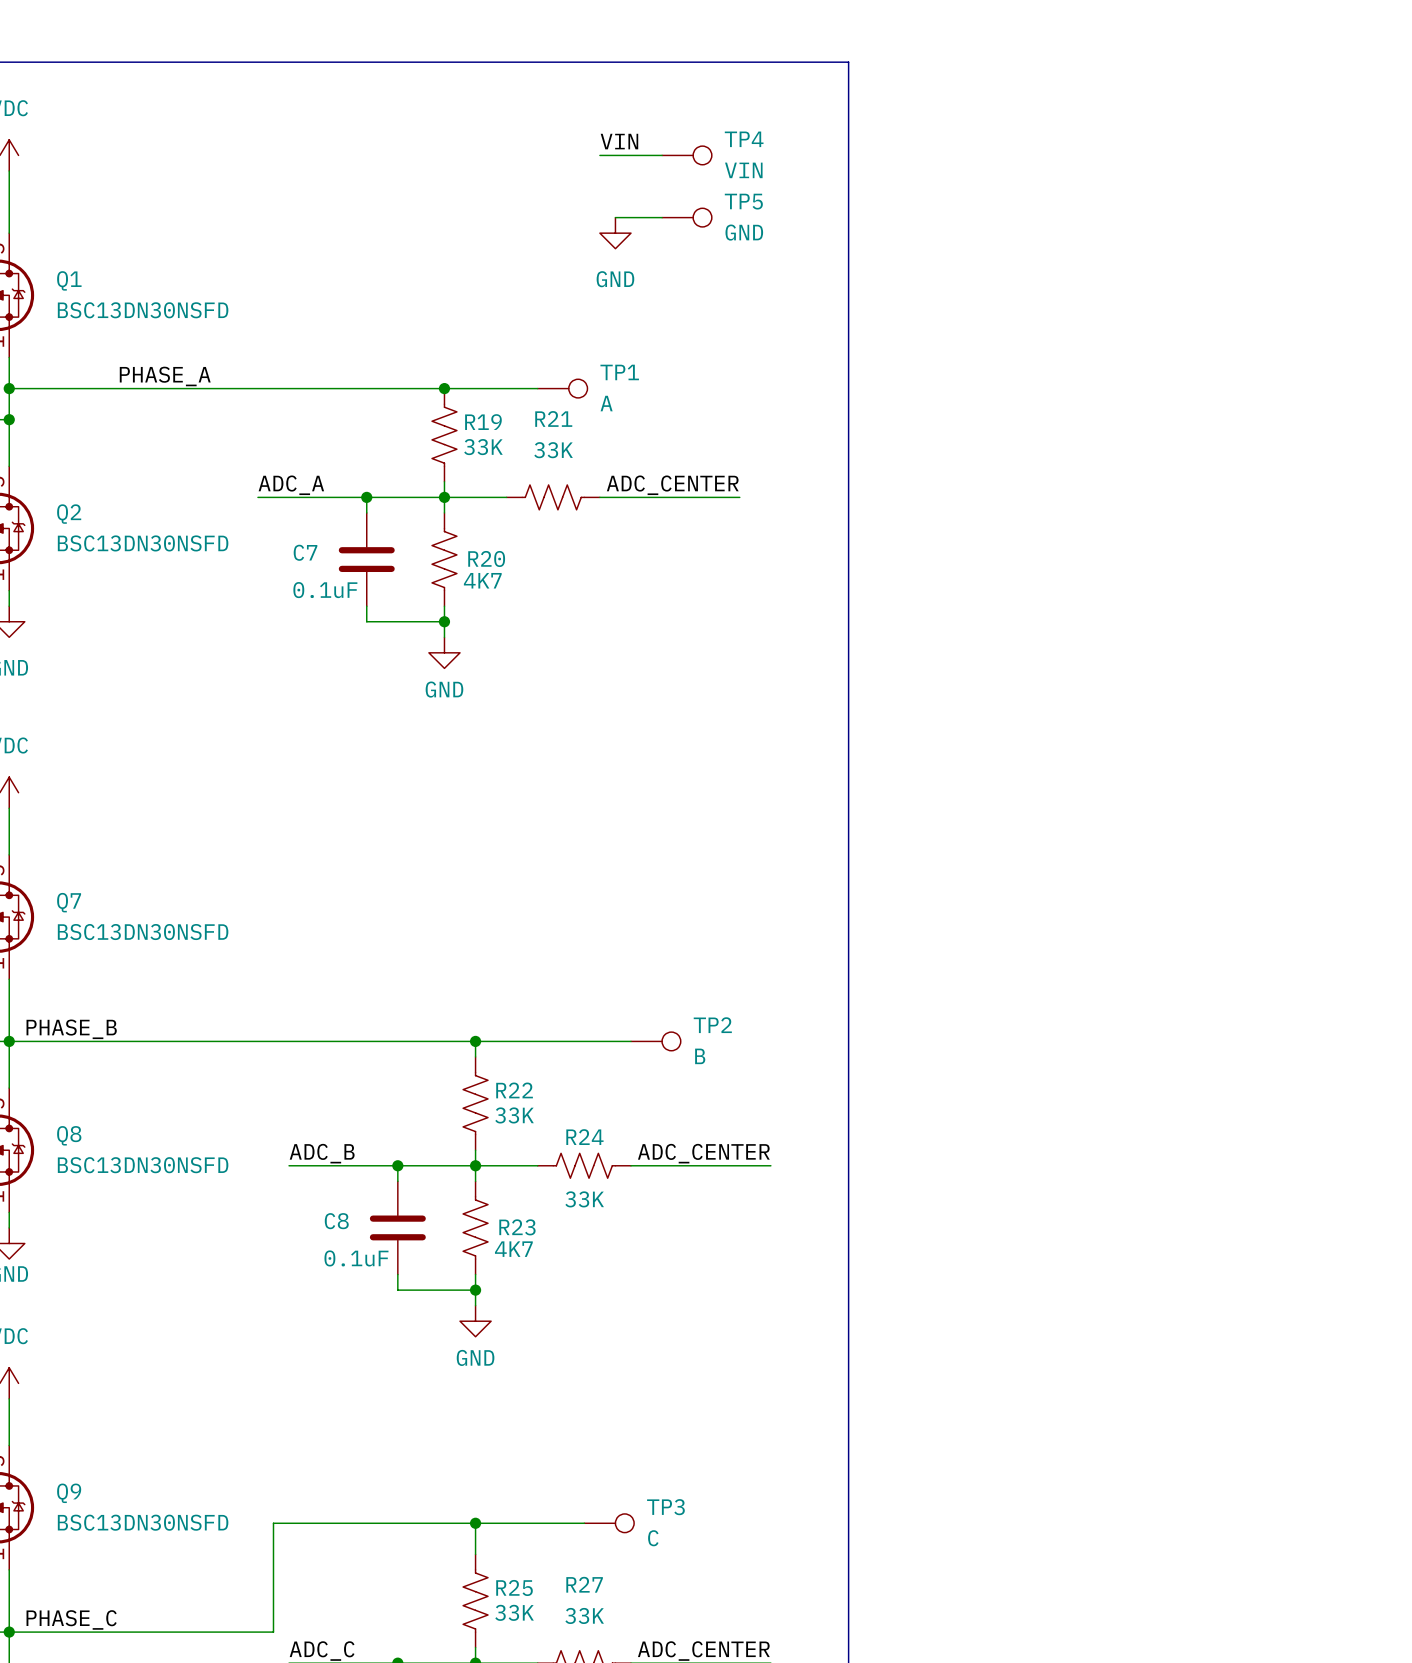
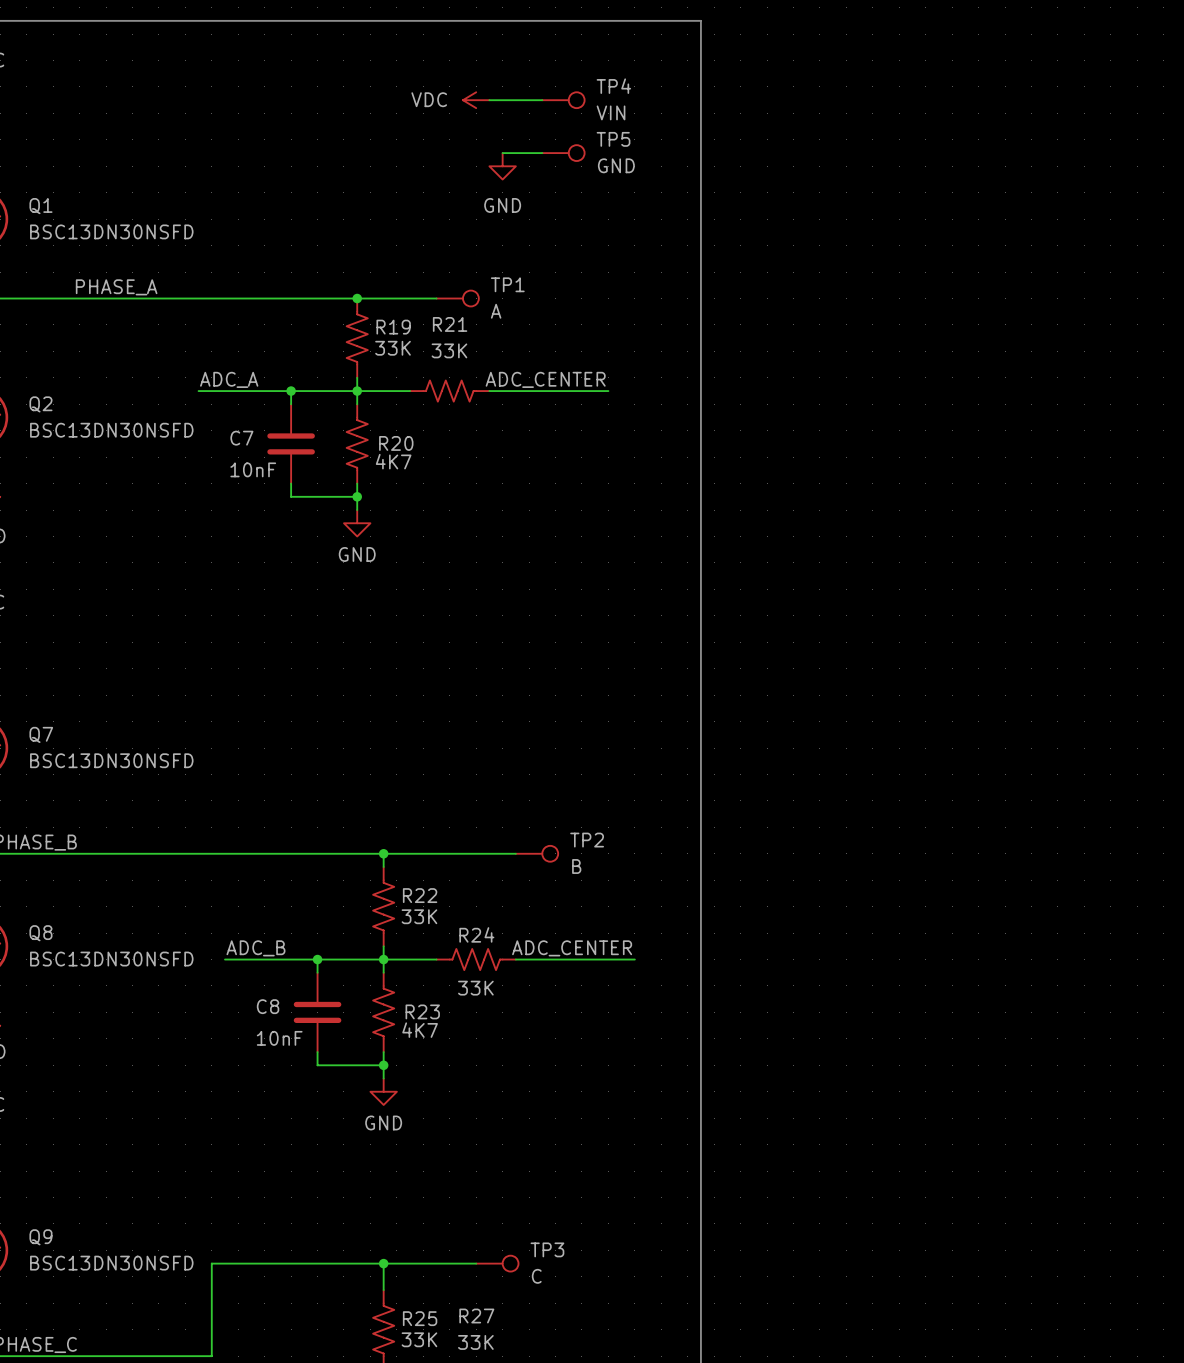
label: VIN (619, 141) -> none
power symbol: none -> VDC (476, 100)
C7 value: 0.1uF (325, 590) -> 10nF (253, 469)
C8 value: 0.1uF (356, 1258) -> 10nF (279, 1038)

